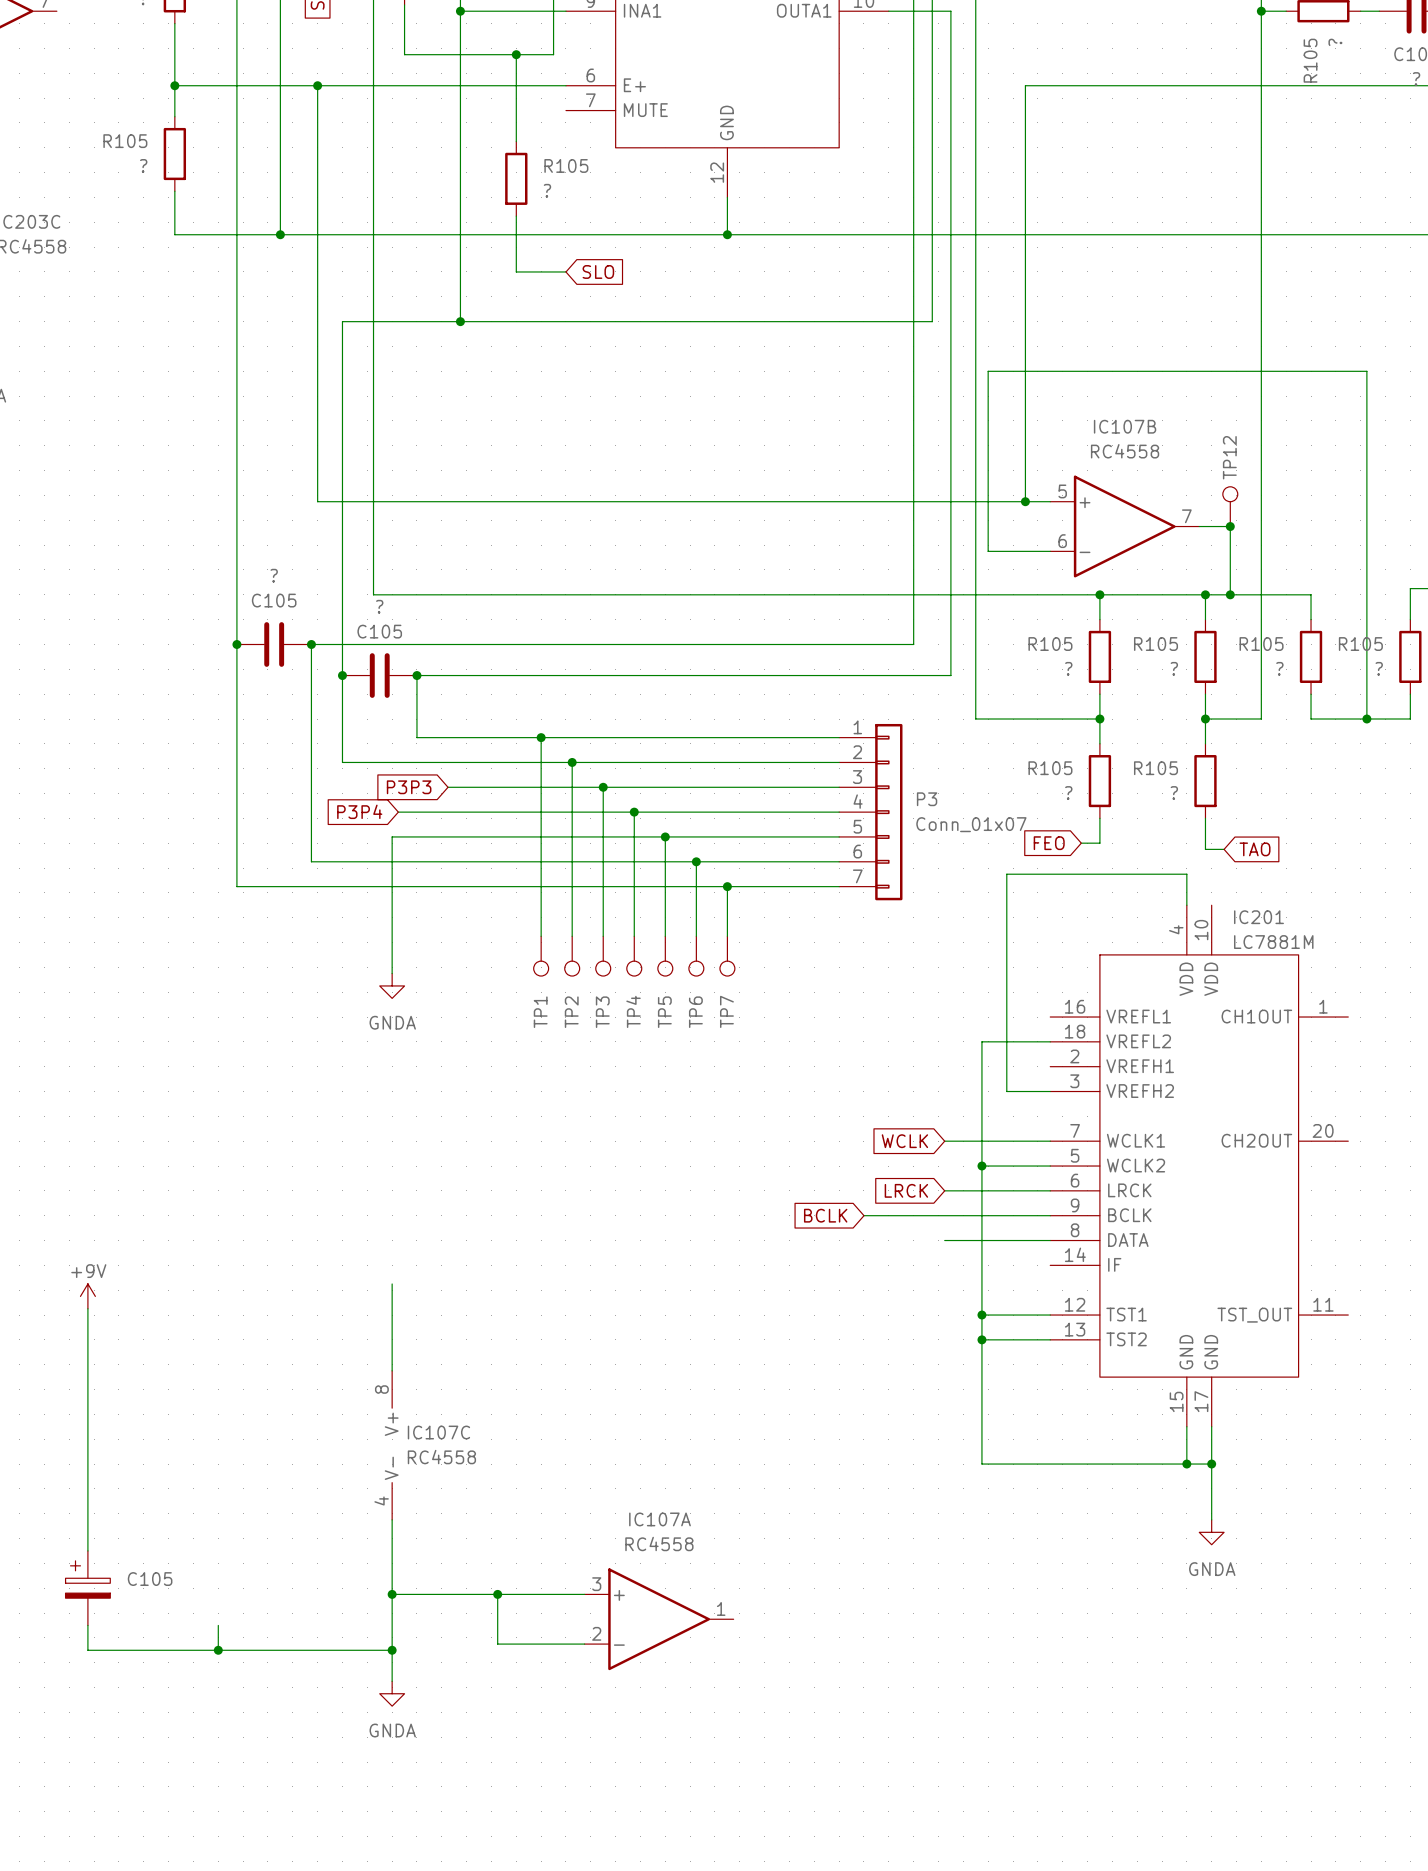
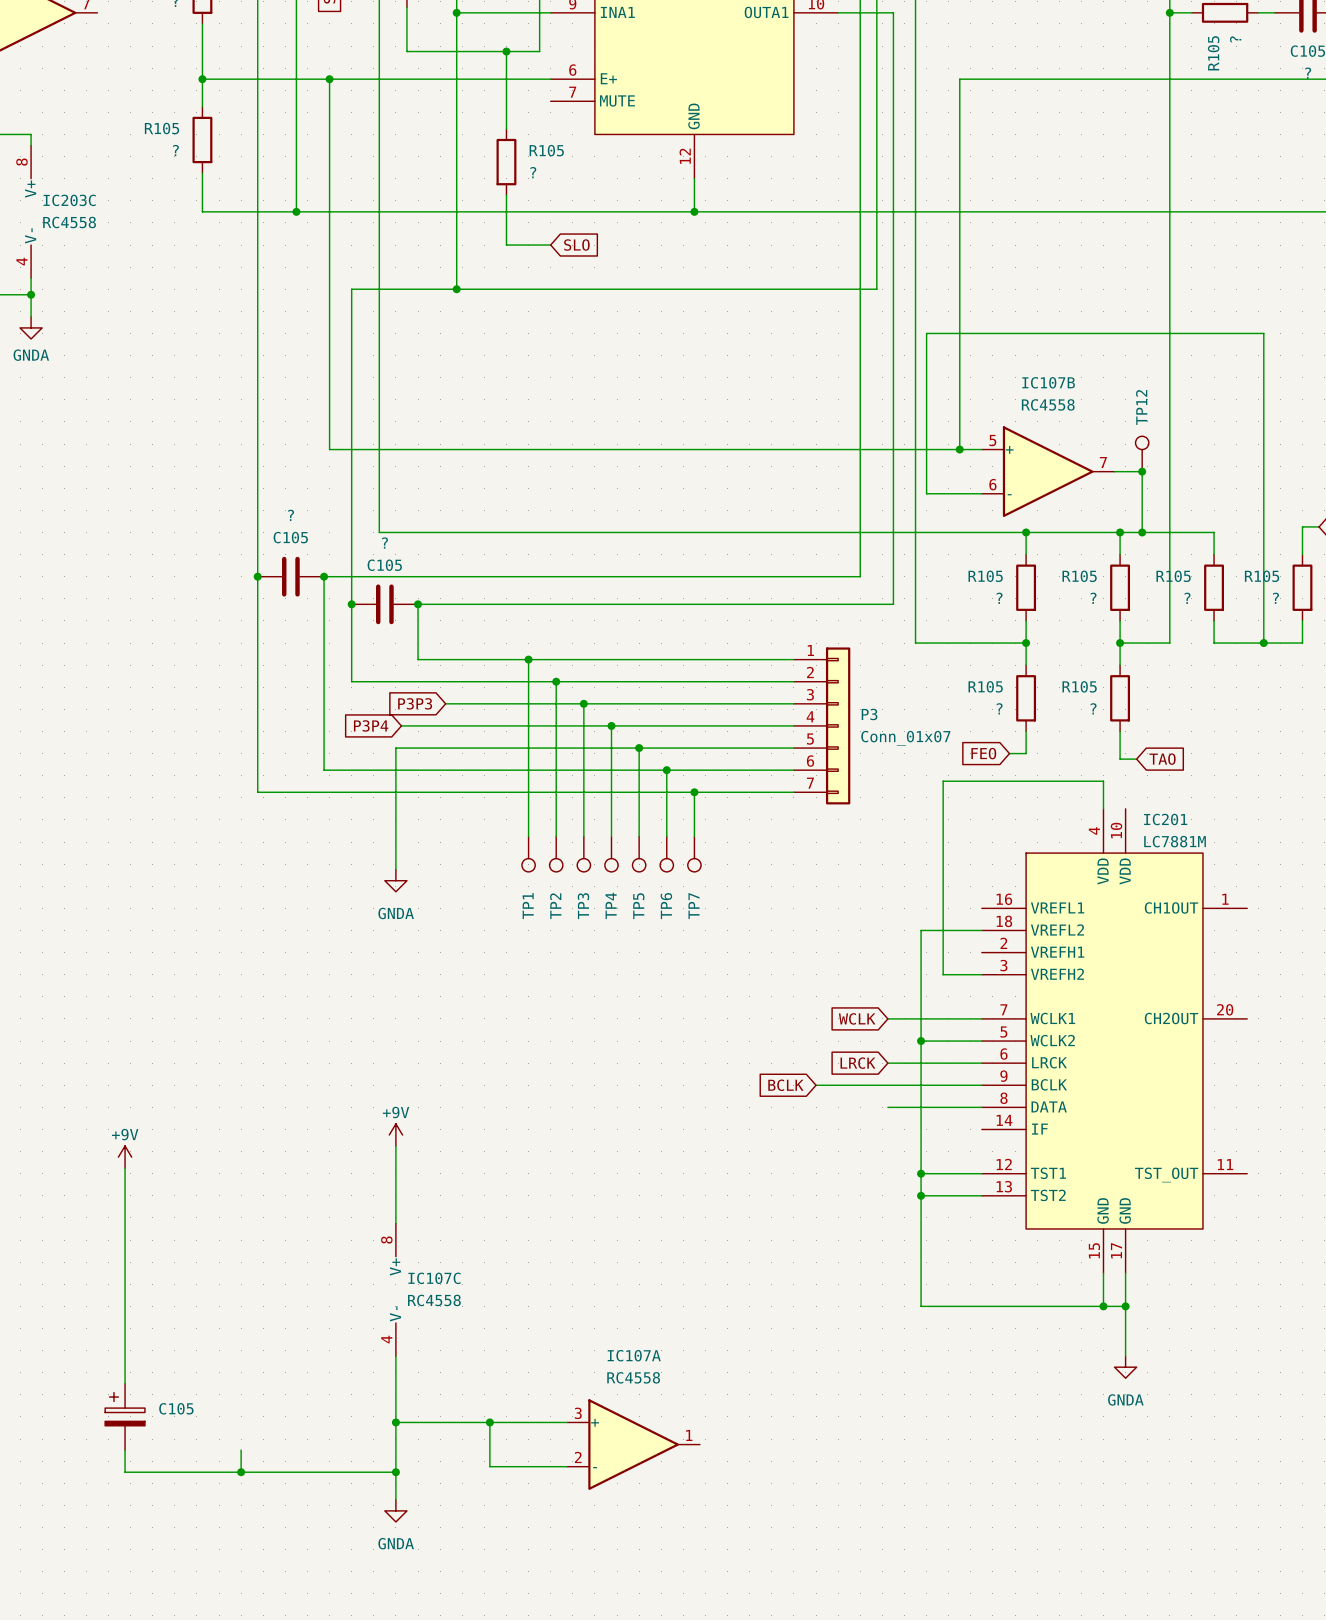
power symbol: none -> +9V (395, 1135)

